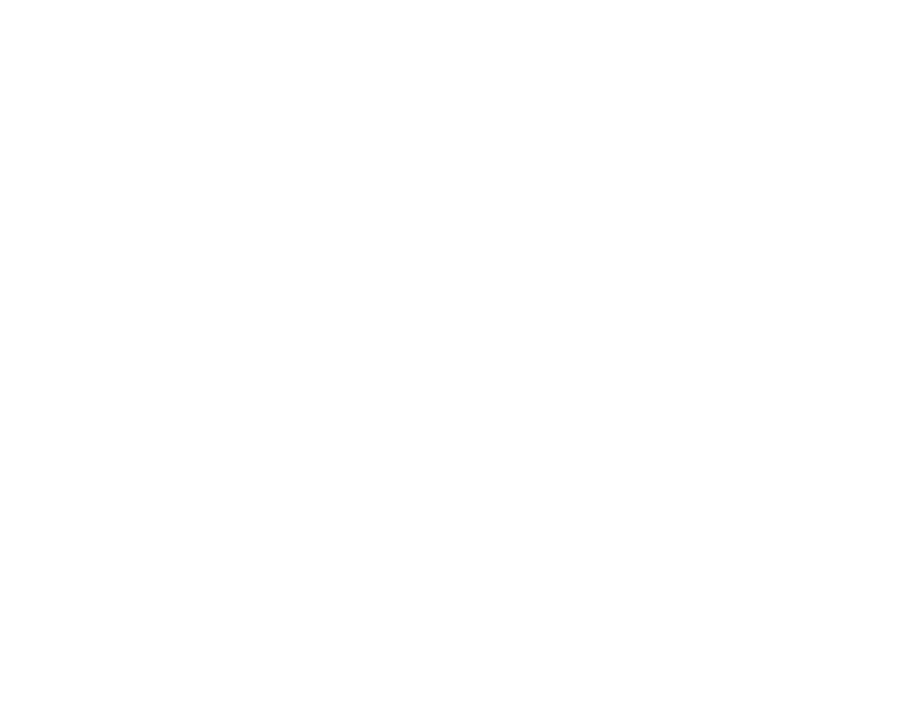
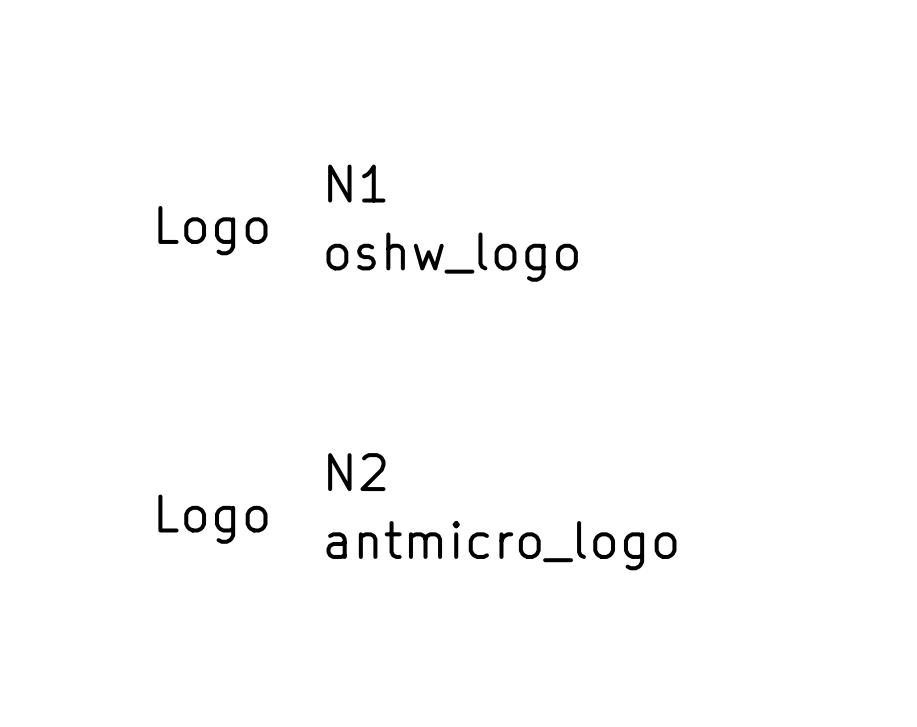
N1: none -> oshw_logo (368, 223)
N2: none -> antmicro_logo (417, 511)

